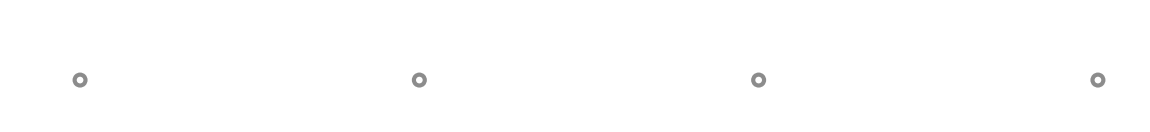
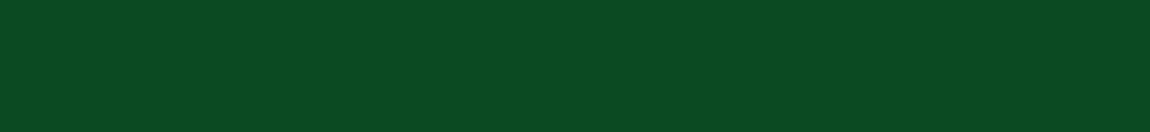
via: (80, 80) -> none
via: (419, 80) -> none
via: (758, 80) -> none
via: (1097, 80) -> none

